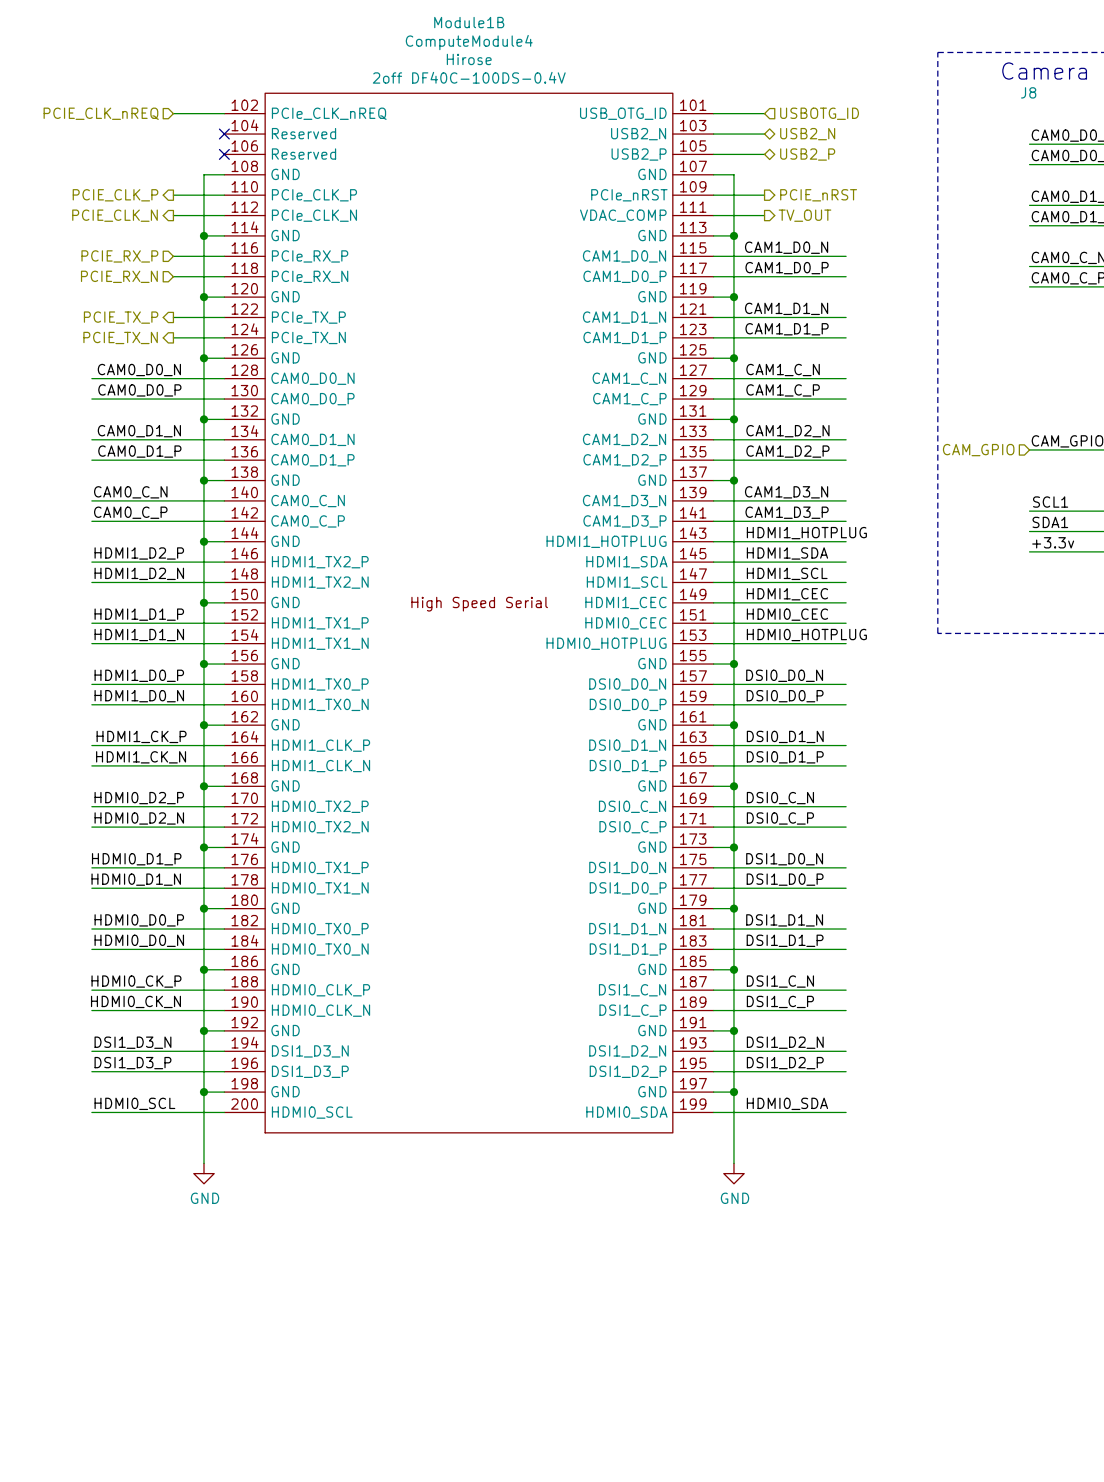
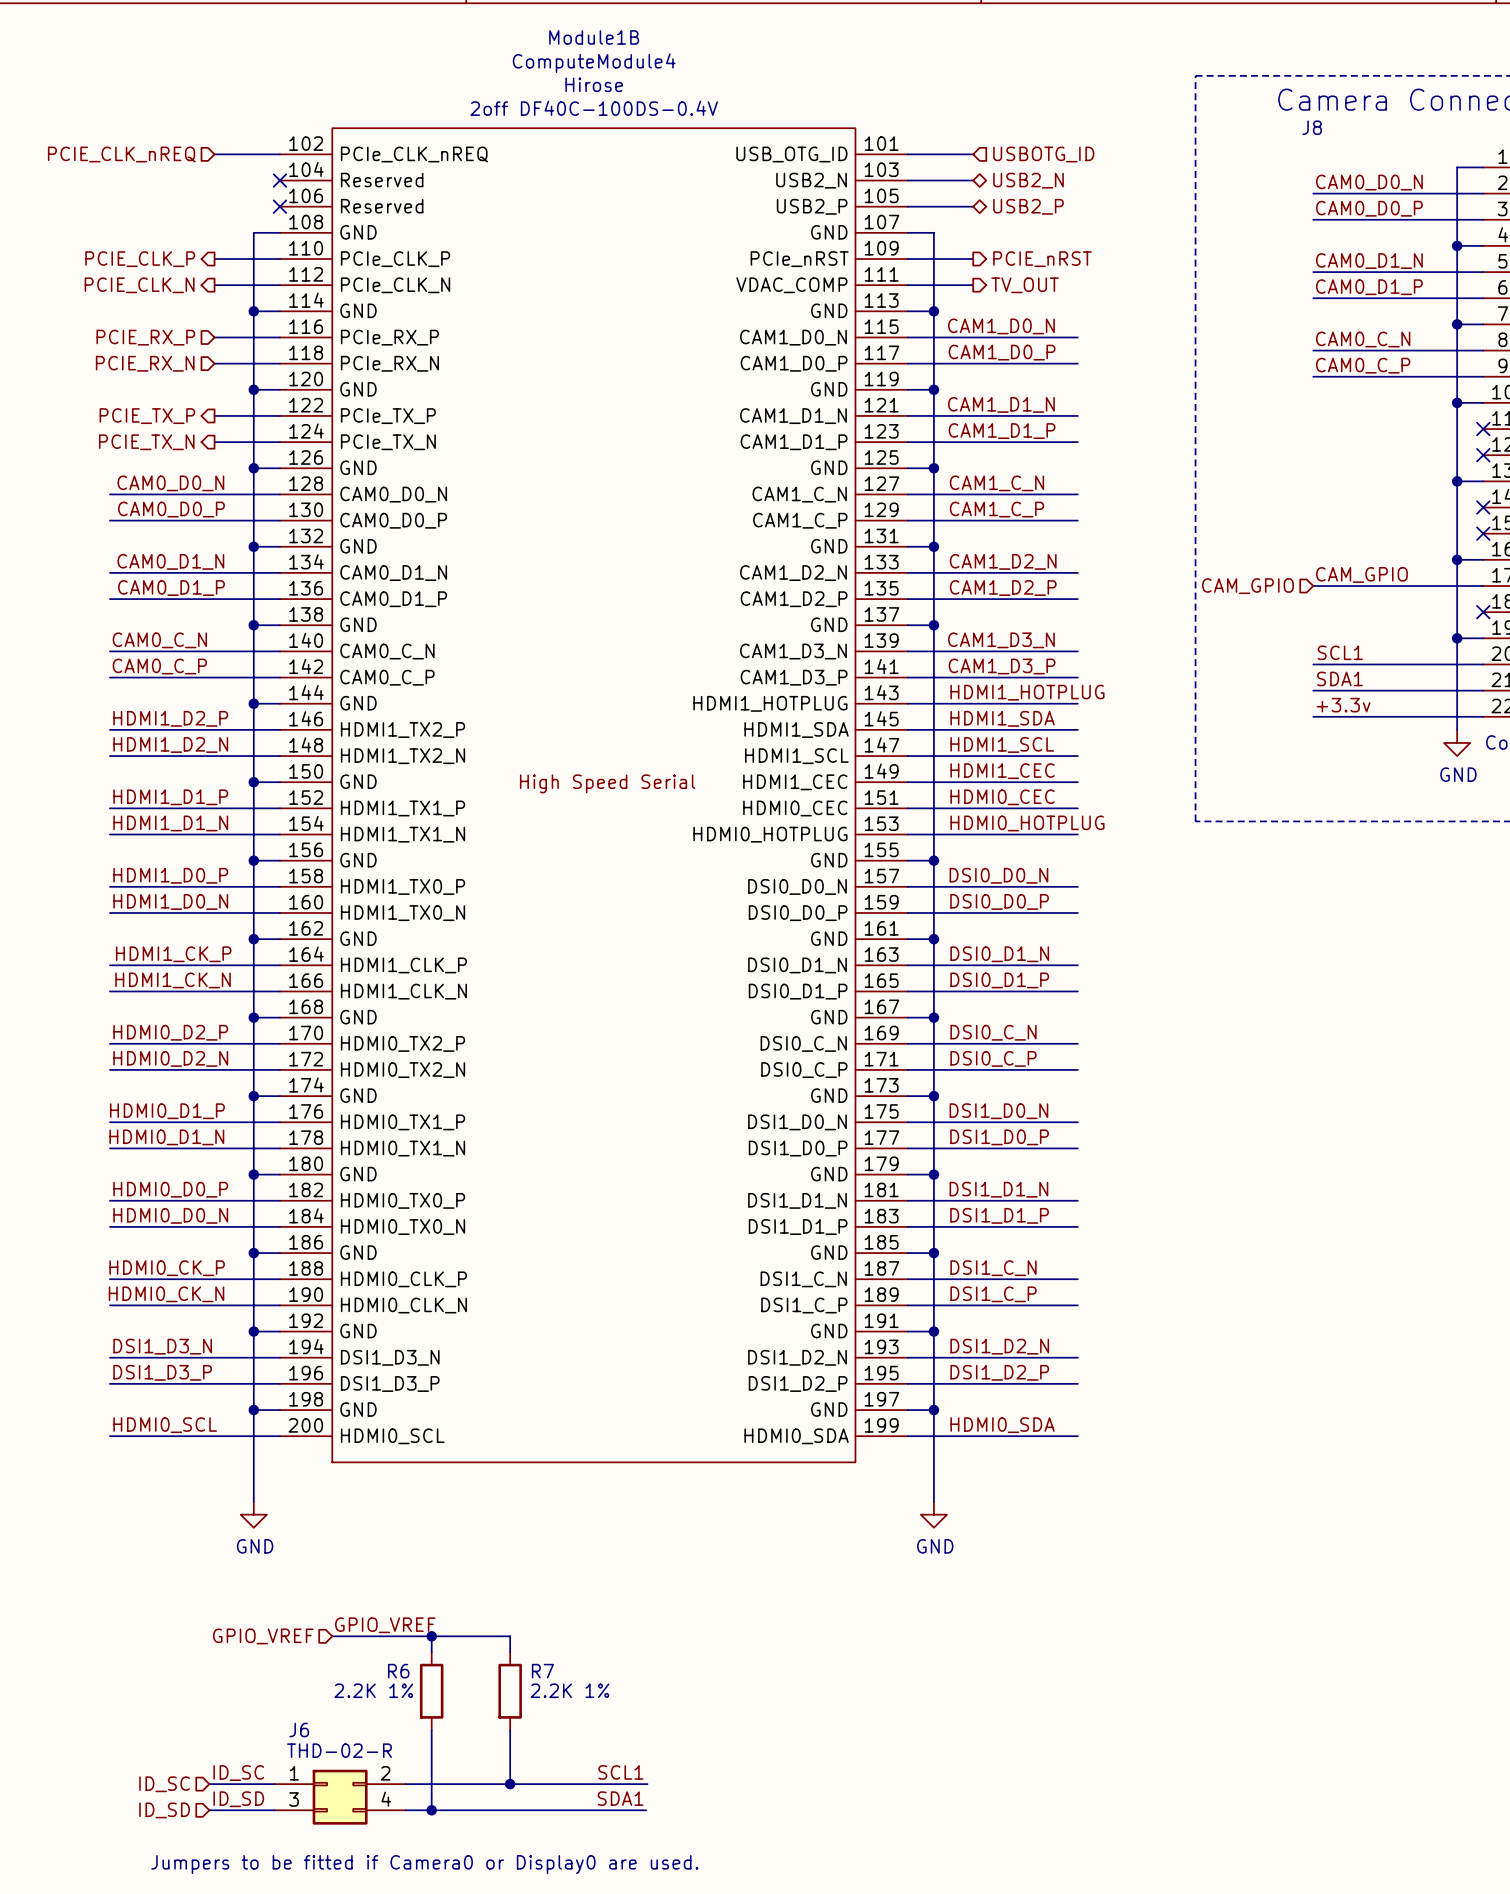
label: none -> GPIO_VREF (385, 1625)
hierarchical label: none -> GPIO_VREF (263, 1636)
wire: none -> (332, 1636) (510, 1636) (510, 1652)
wire: none -> (431, 1636) (431, 1652)
junction: none -> (431, 1636)
R6: none -> 2.2K 1% (431, 1691)
R7: none -> 2.2K 1% (510, 1691)
wire: none -> (431, 1730) (431, 1810)
wire: none -> (510, 1730) (510, 1784)
label: none -> ID_SC (238, 1773)
label: none -> SCL1 (620, 1772)
hierarchical label: none -> ID_SC (164, 1784)
wire: none -> (209, 1784) (274, 1784)
wire: none -> (405, 1784) (647, 1784)
junction: none -> (510, 1784)
J6: none -> THD-02-R (340, 1797)
label: none -> SDA1 (620, 1798)
label: none -> ID_SD (238, 1799)
wire: none -> (209, 1810) (274, 1810)
wire: none -> (405, 1810) (646, 1810)
junction: none -> (431, 1810)
hierarchical label: none -> ID_SD (164, 1810)
text: none -> Jumpers to be fitted if Camera0 or Display0 are used. (424, 1864)

